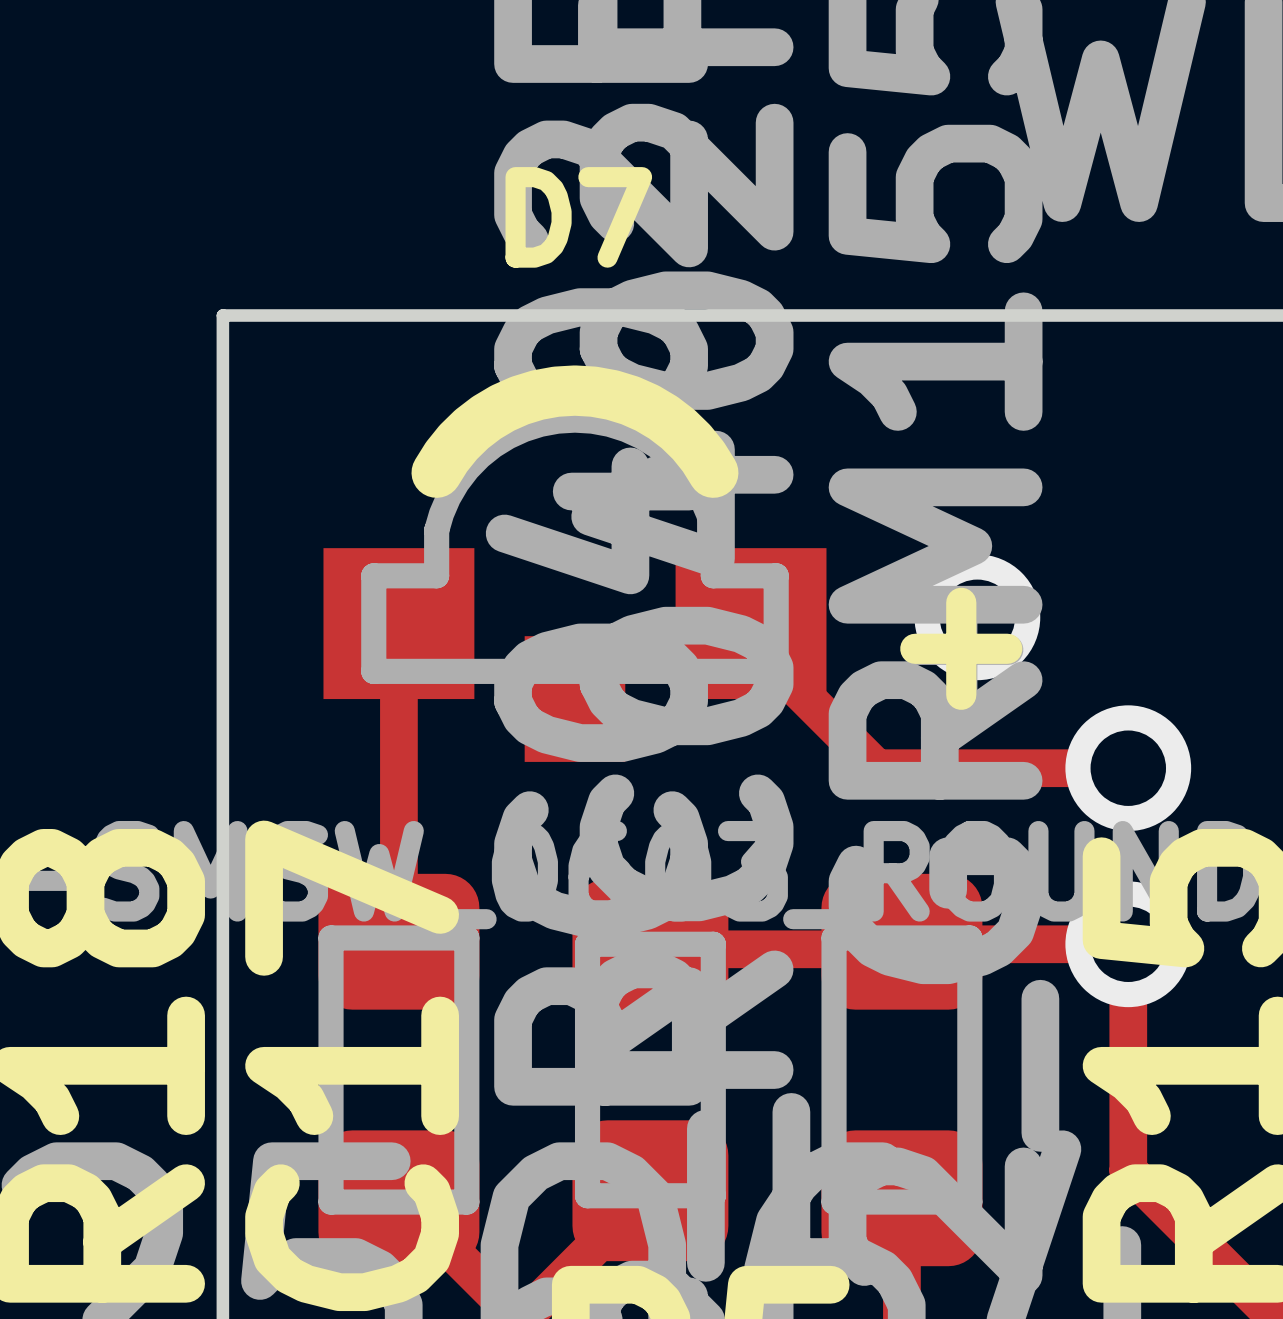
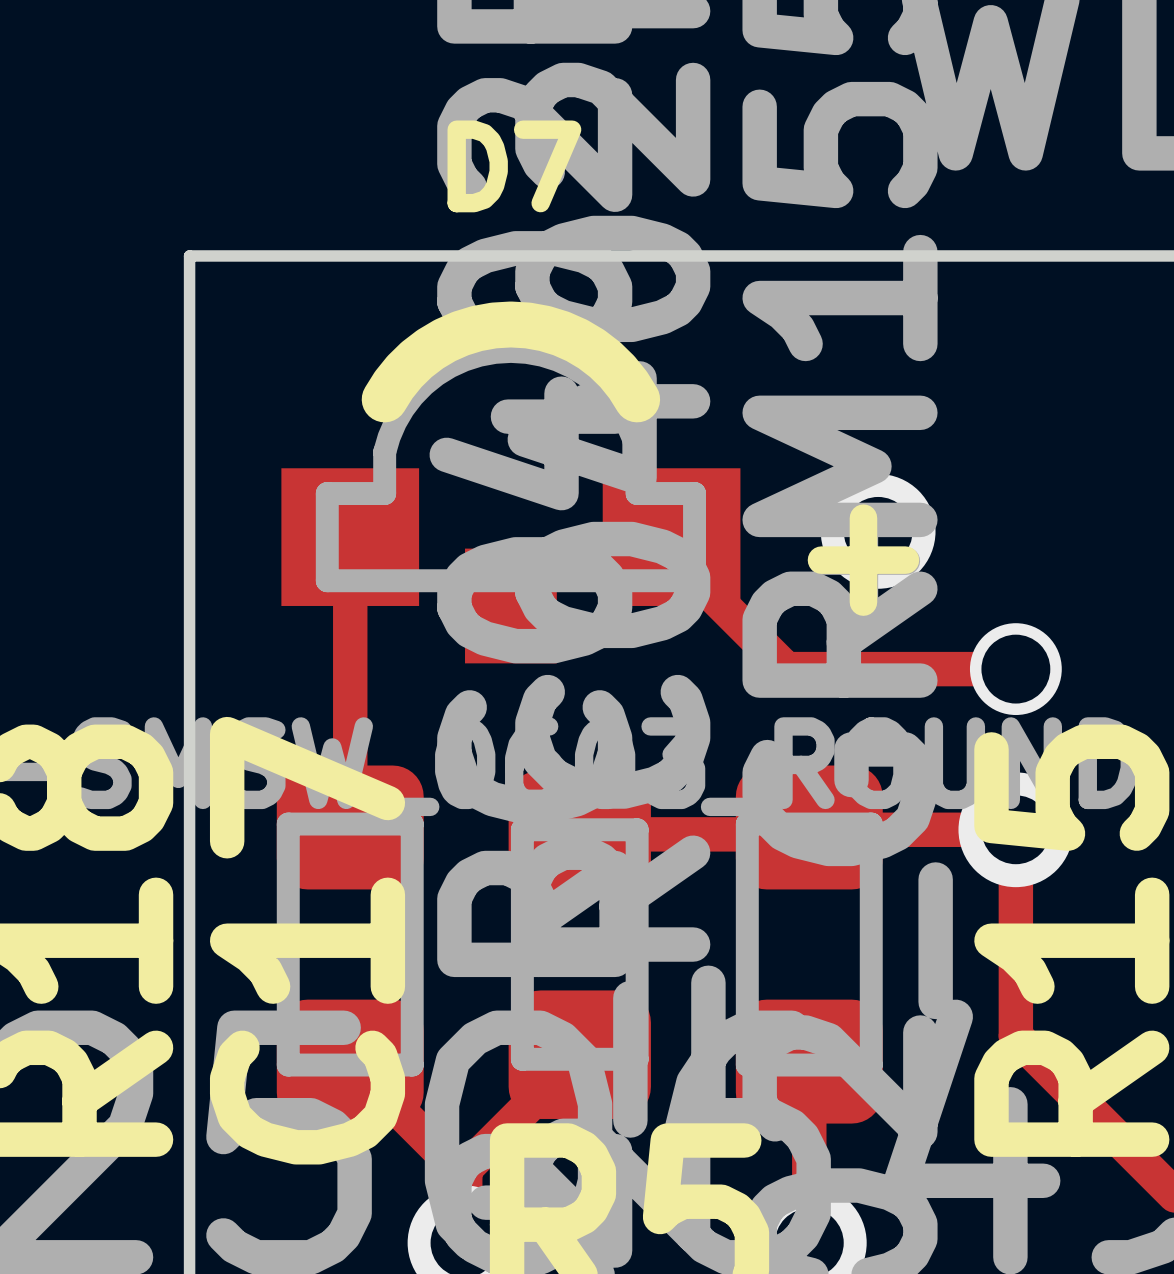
via size: [1065, 705, 1192, 832] -> [969, 623, 1062, 716]

